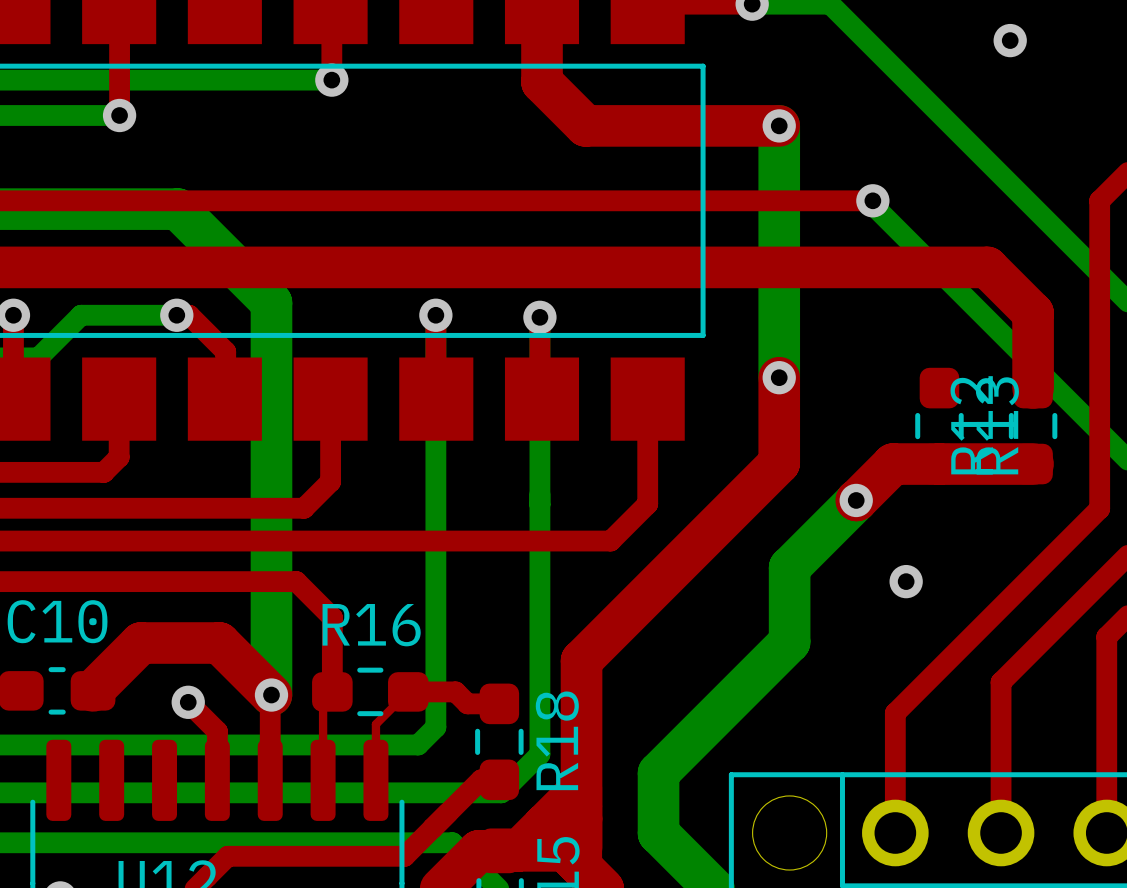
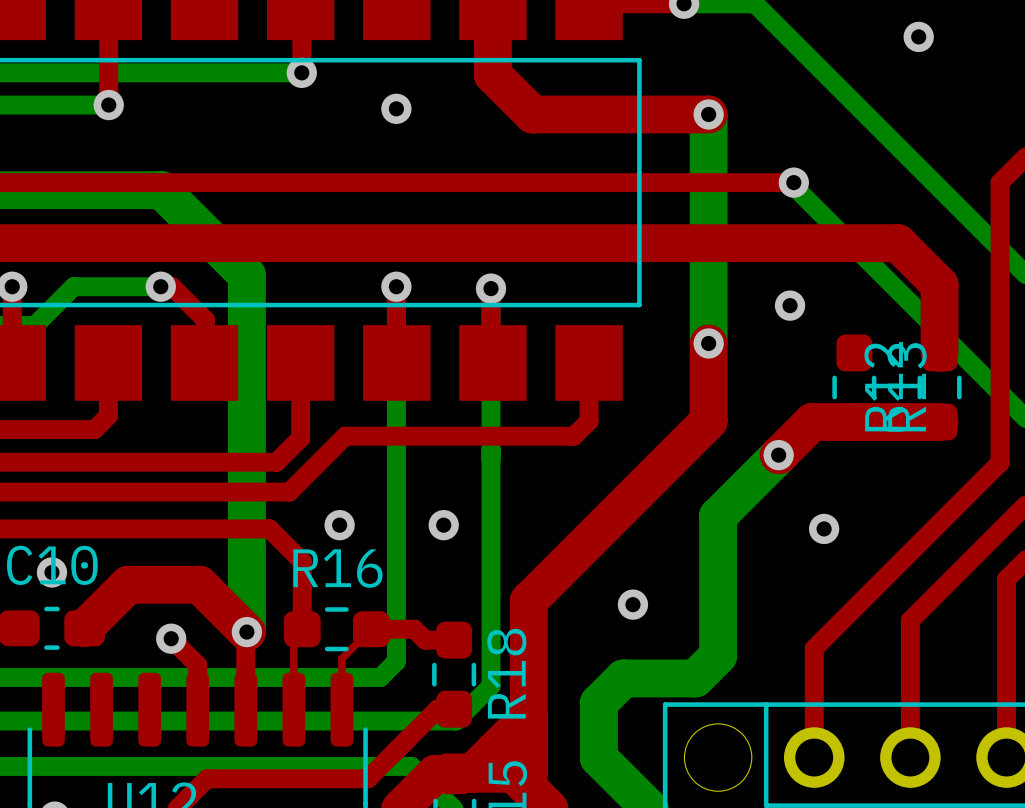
via: none -> (396, 108)
via: none -> (790, 305)
top track: (647, 463) (647, 504) (610, 541) (318, 541) -> (589, 421) (573, 436) (345, 436) (289, 492)
via: none -> (339, 525)
via: none -> (443, 525)
via: none -> (51, 572)
bottom track: (789, 641) (685, 746) -> (718, 583) (718, 655) (695, 678) (623, 678)
via: none -> (632, 604)

